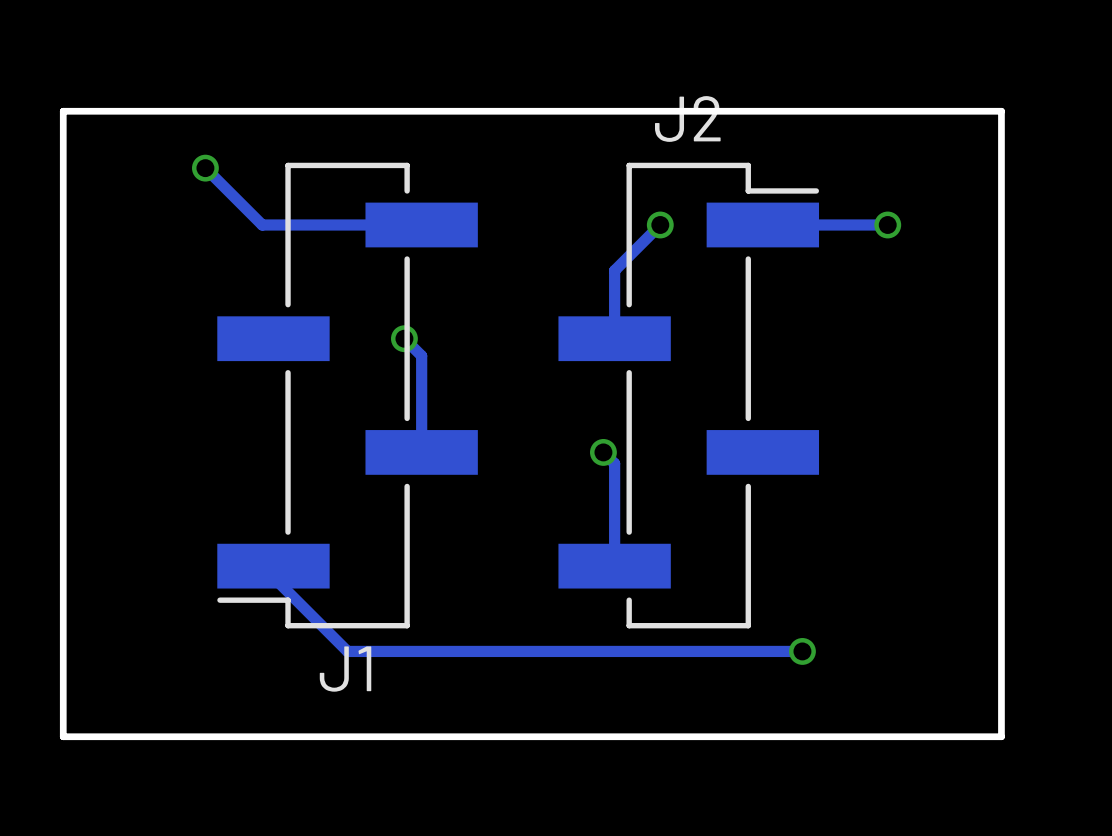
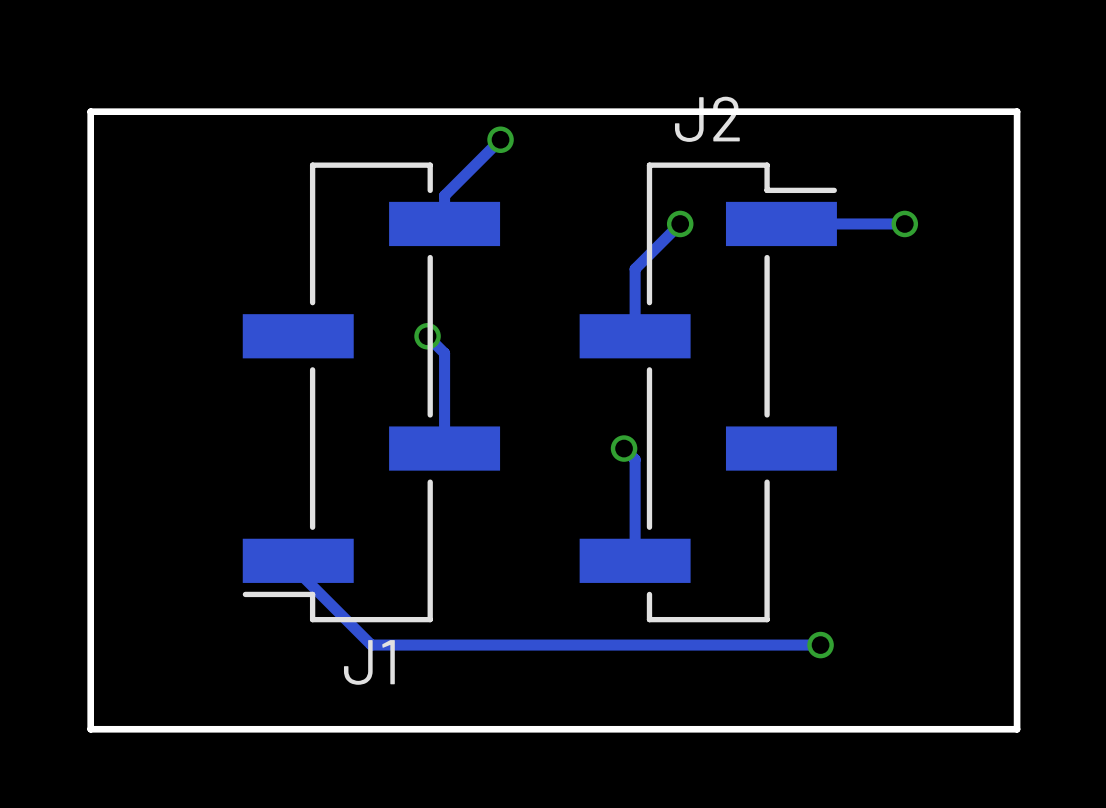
via: none -> (500, 139)
track: (205, 168) (262, 224) (421, 224) -> (500, 139) (444, 195) (444, 223)
via: (205, 168) -> none

